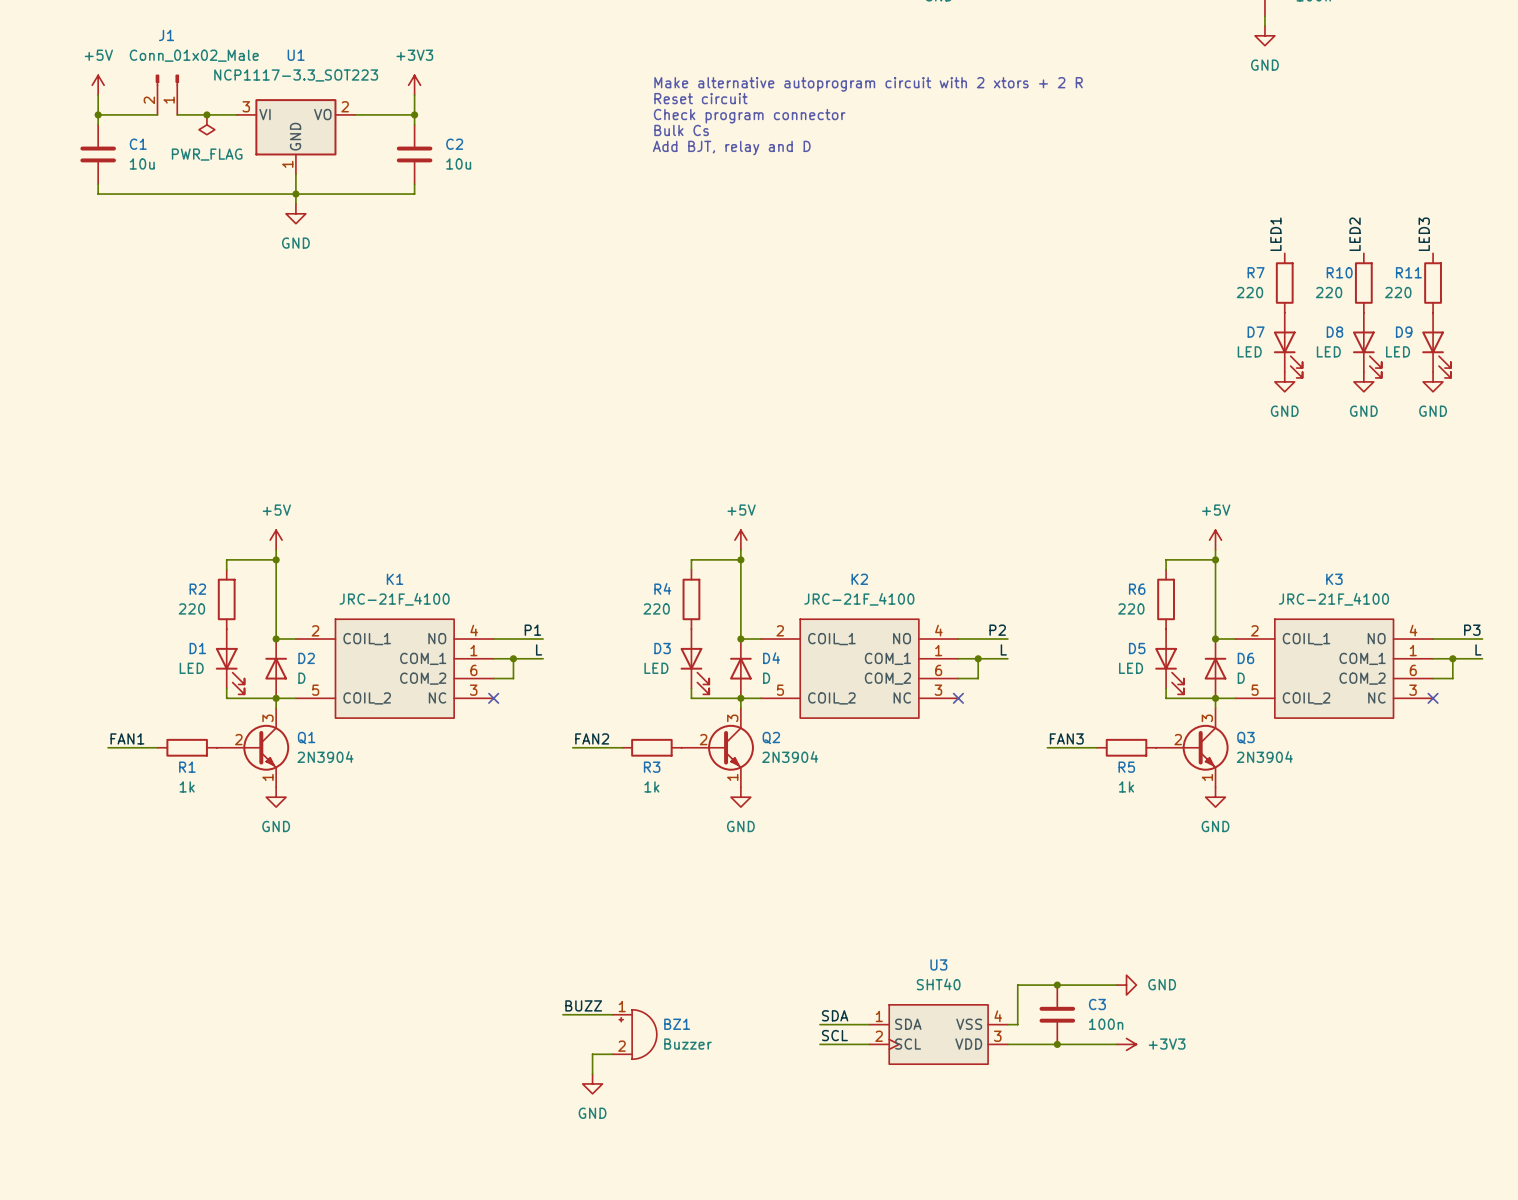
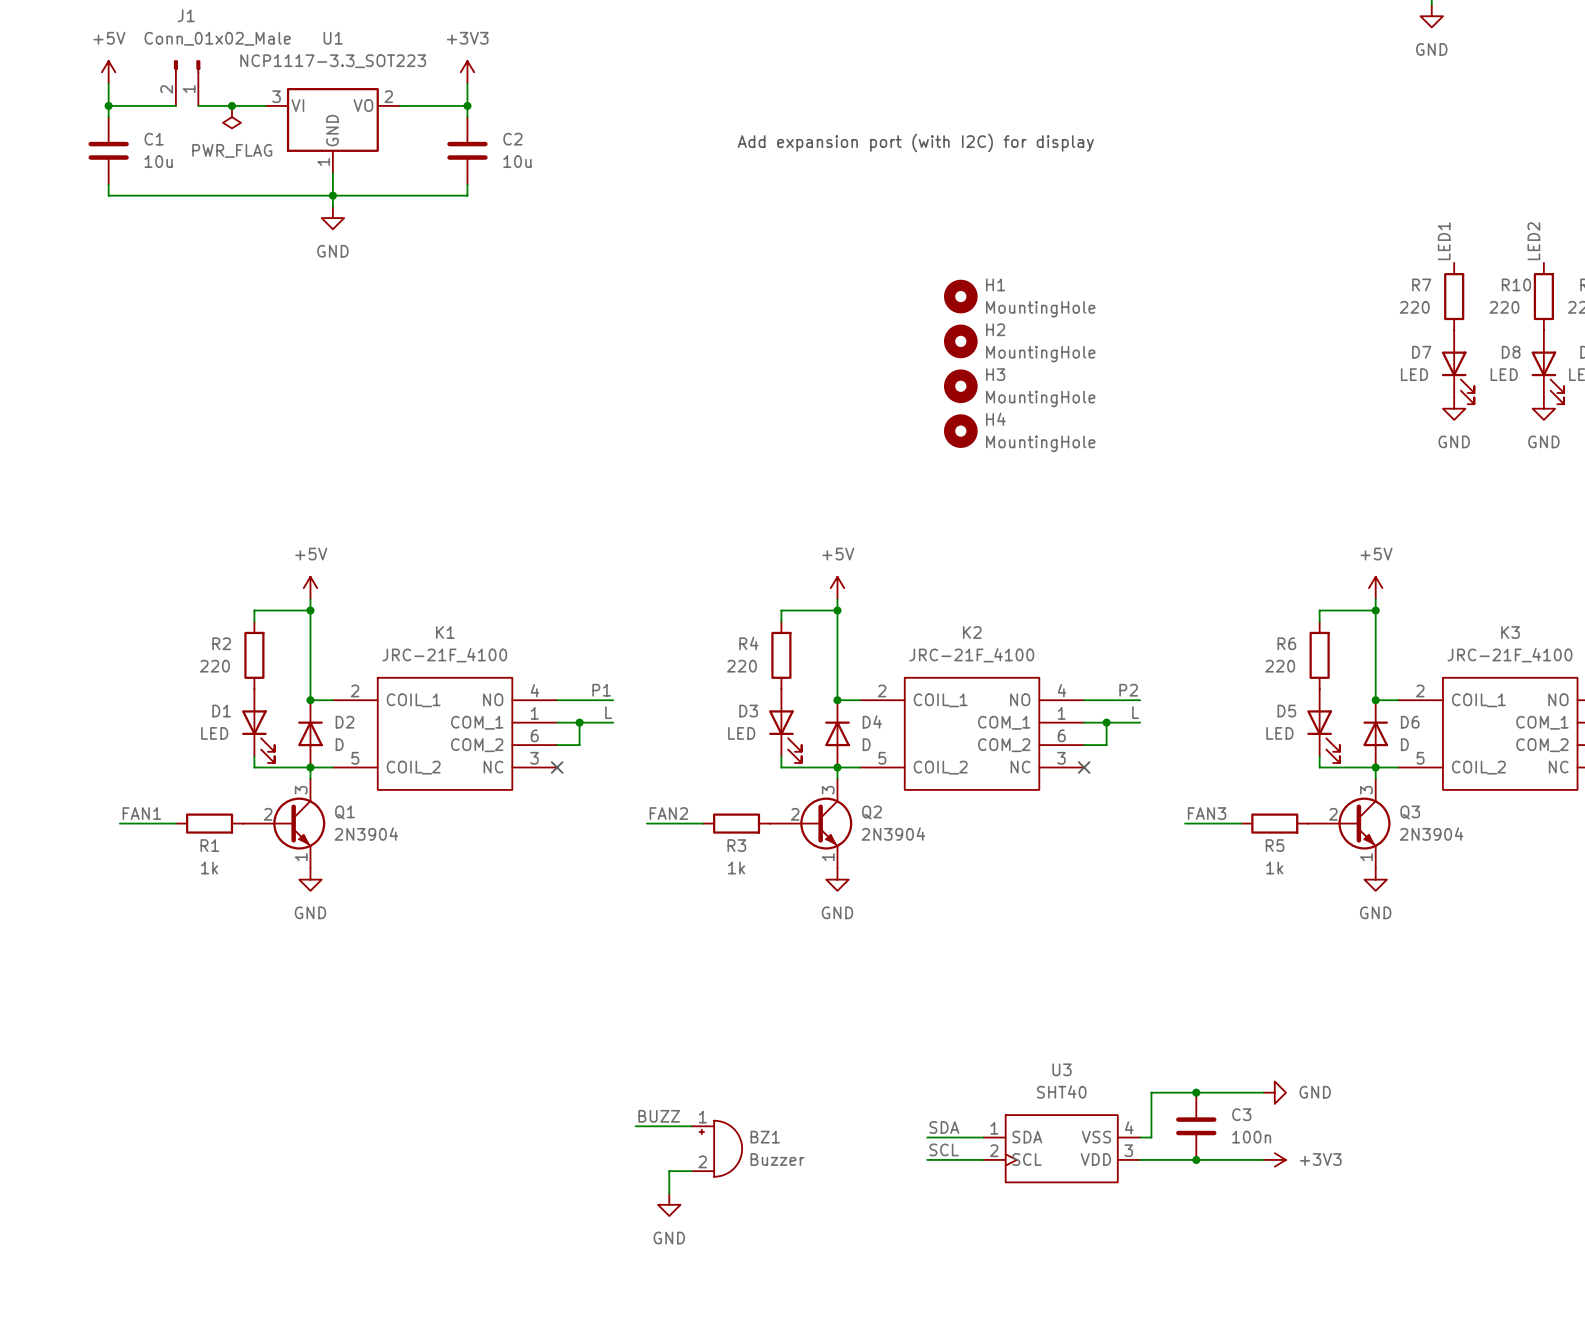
text: Make alternative autoprogram circuit with 2 xtors + 2 R (868, 84) -> none
text: Reset circuit (700, 98) -> none
text: Check program connector (749, 116) -> none
text: Bulk Cs (681, 130) -> none
text: Add BJT, relay and D (731, 148) -> Add expansion port (with I2C) for display (915, 142)
H1: none -> MountingHole (960, 296)
H2: none -> MountingHole (960, 341)
H3: none -> MountingHole (960, 386)
H4: none -> MountingHole (960, 431)

